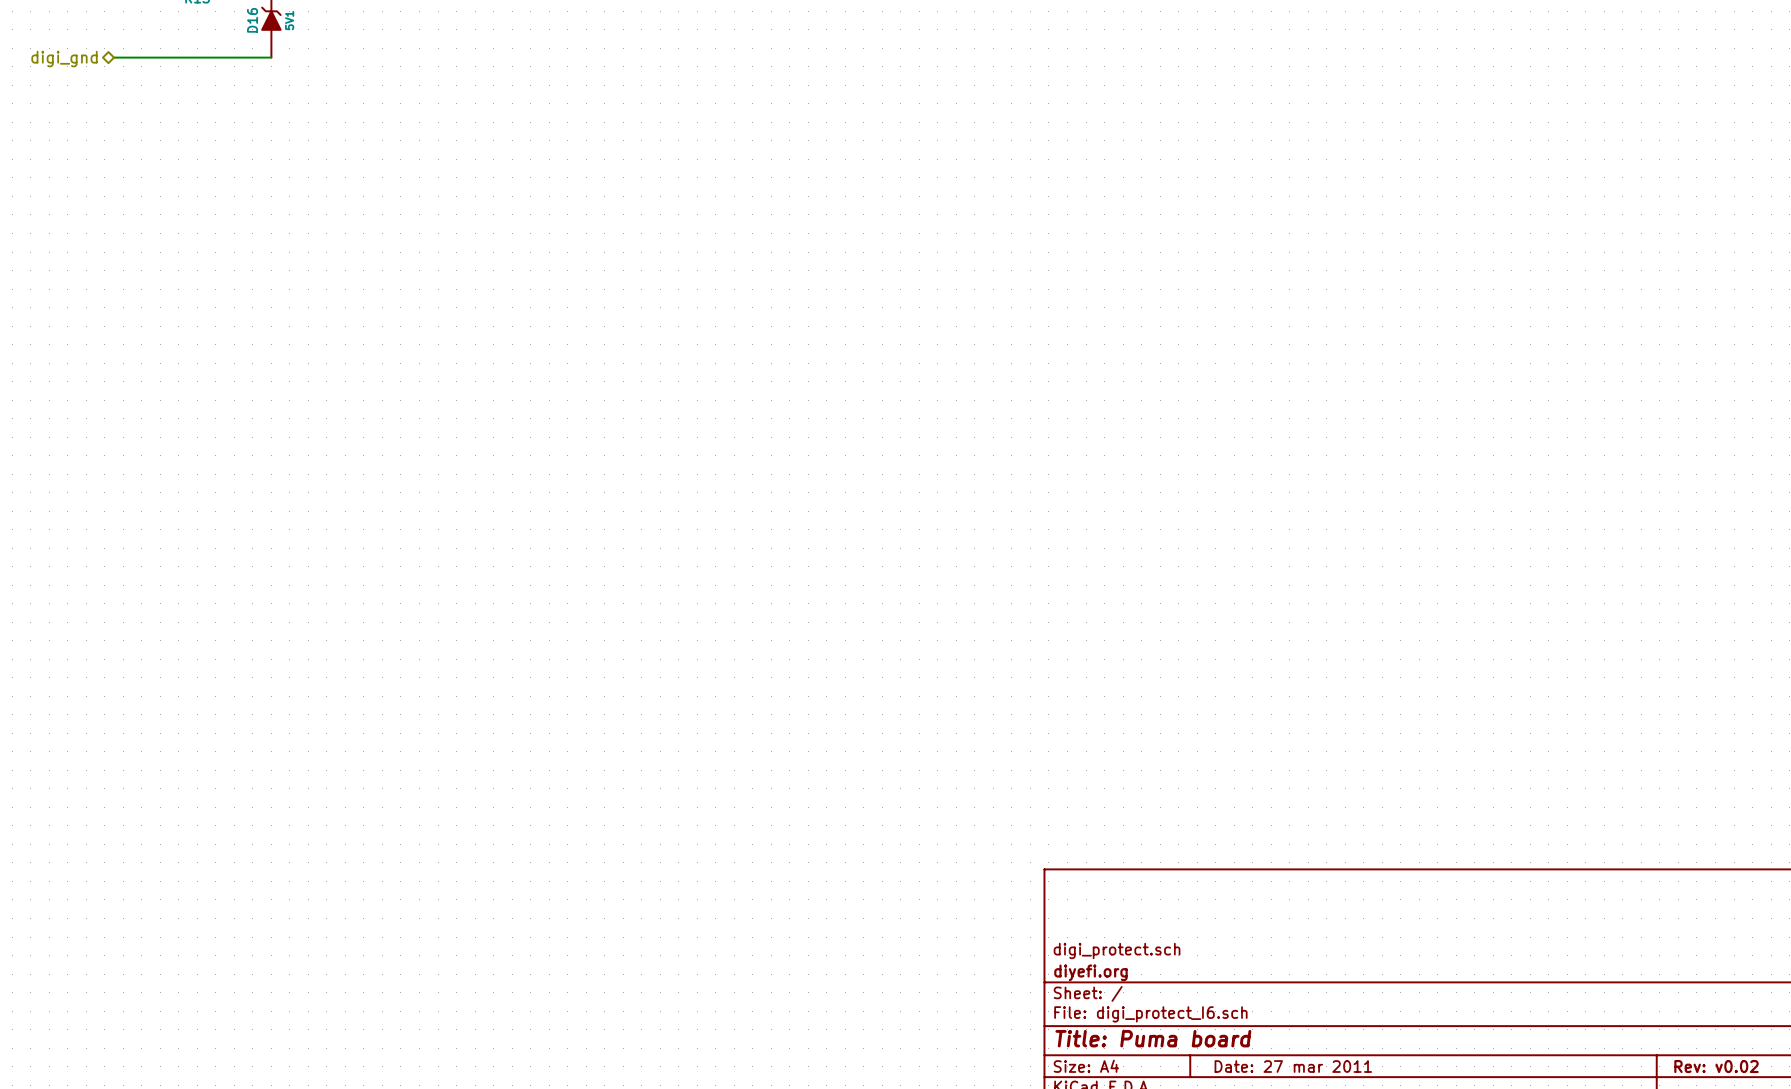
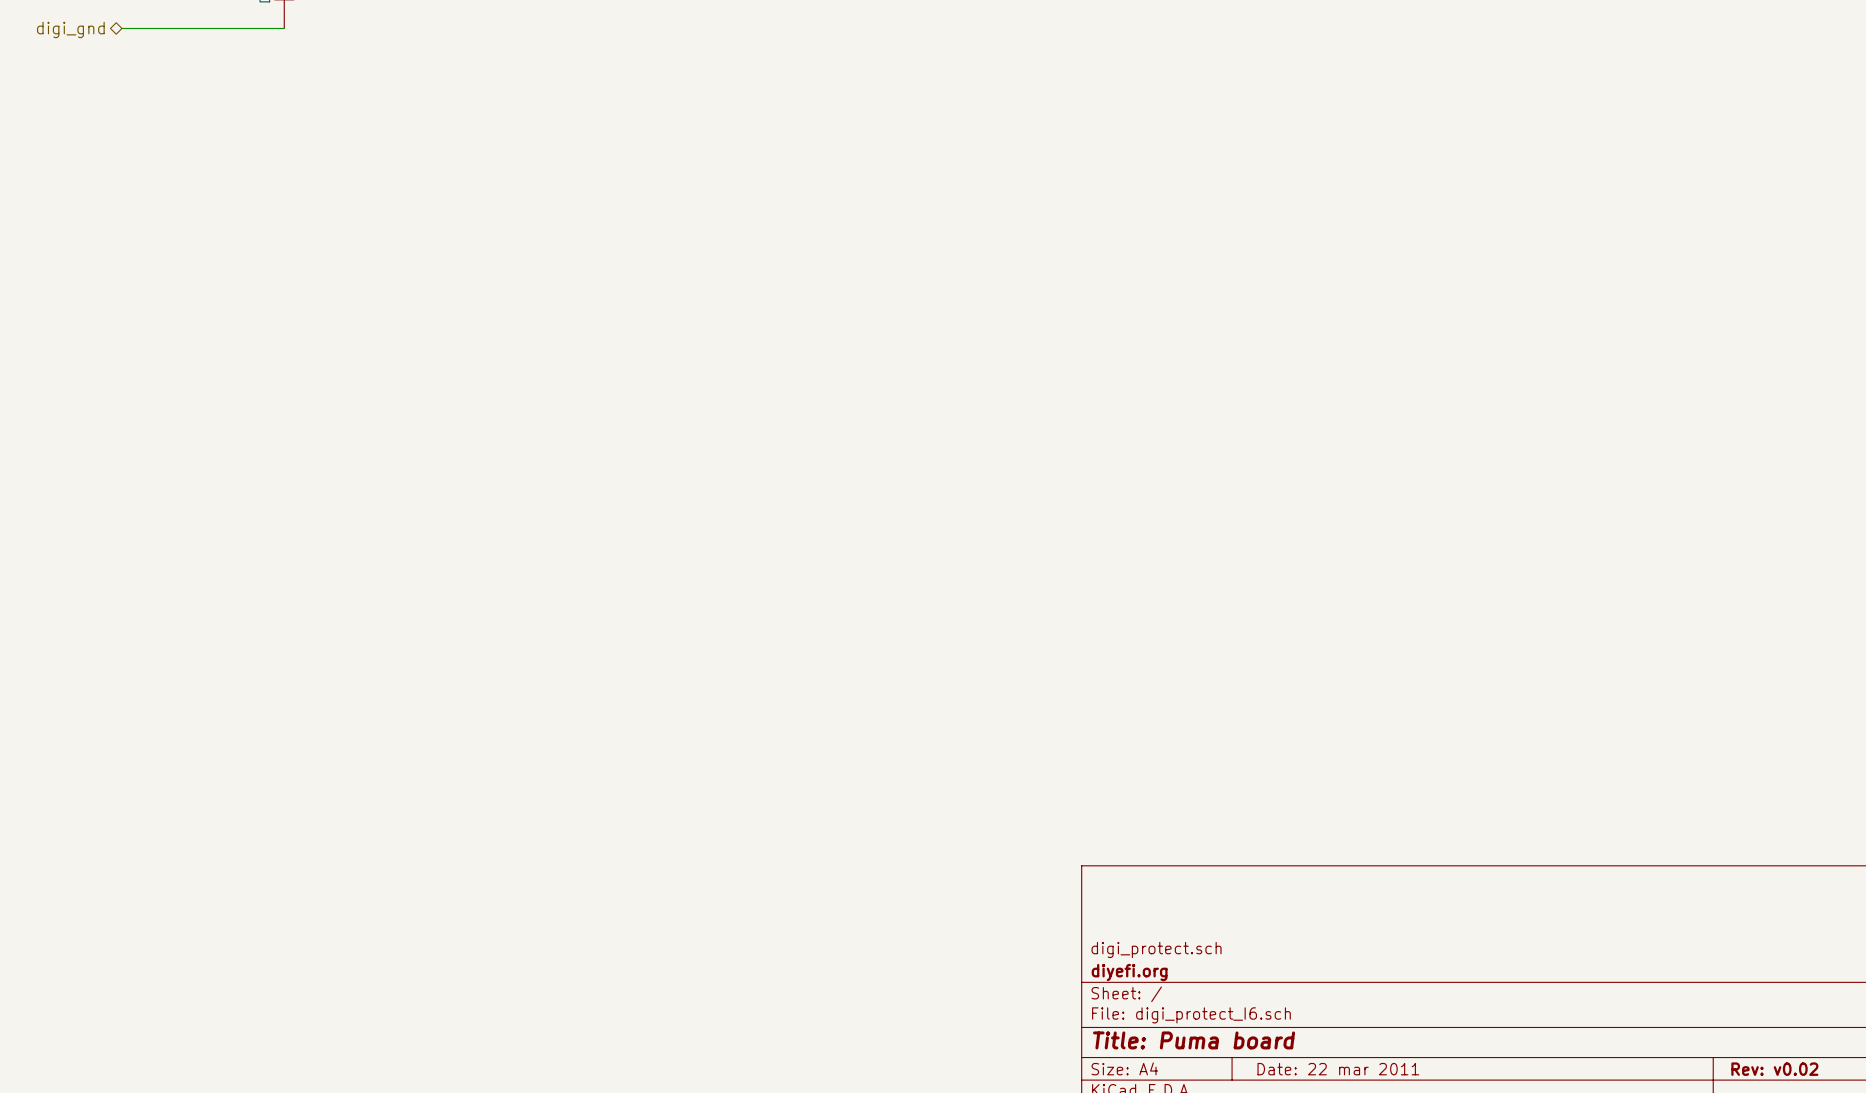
title block: Date: 27 mar 2011 (1293, 1066) -> Date: 22 mar 2011 (1338, 1069)

